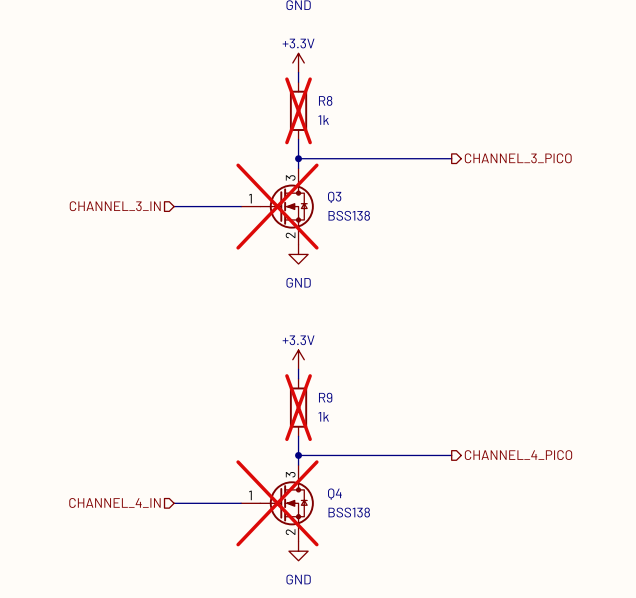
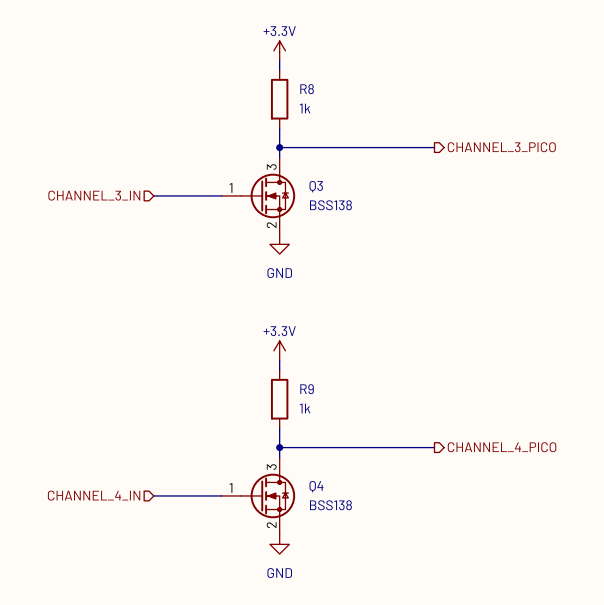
R8 do-not-place cross: (298, 110) -> none
Q3 do-not-place cross: (277, 206) -> none
R9 do-not-place cross: (298, 407) -> none
Q4 do-not-place cross: (277, 503) -> none

